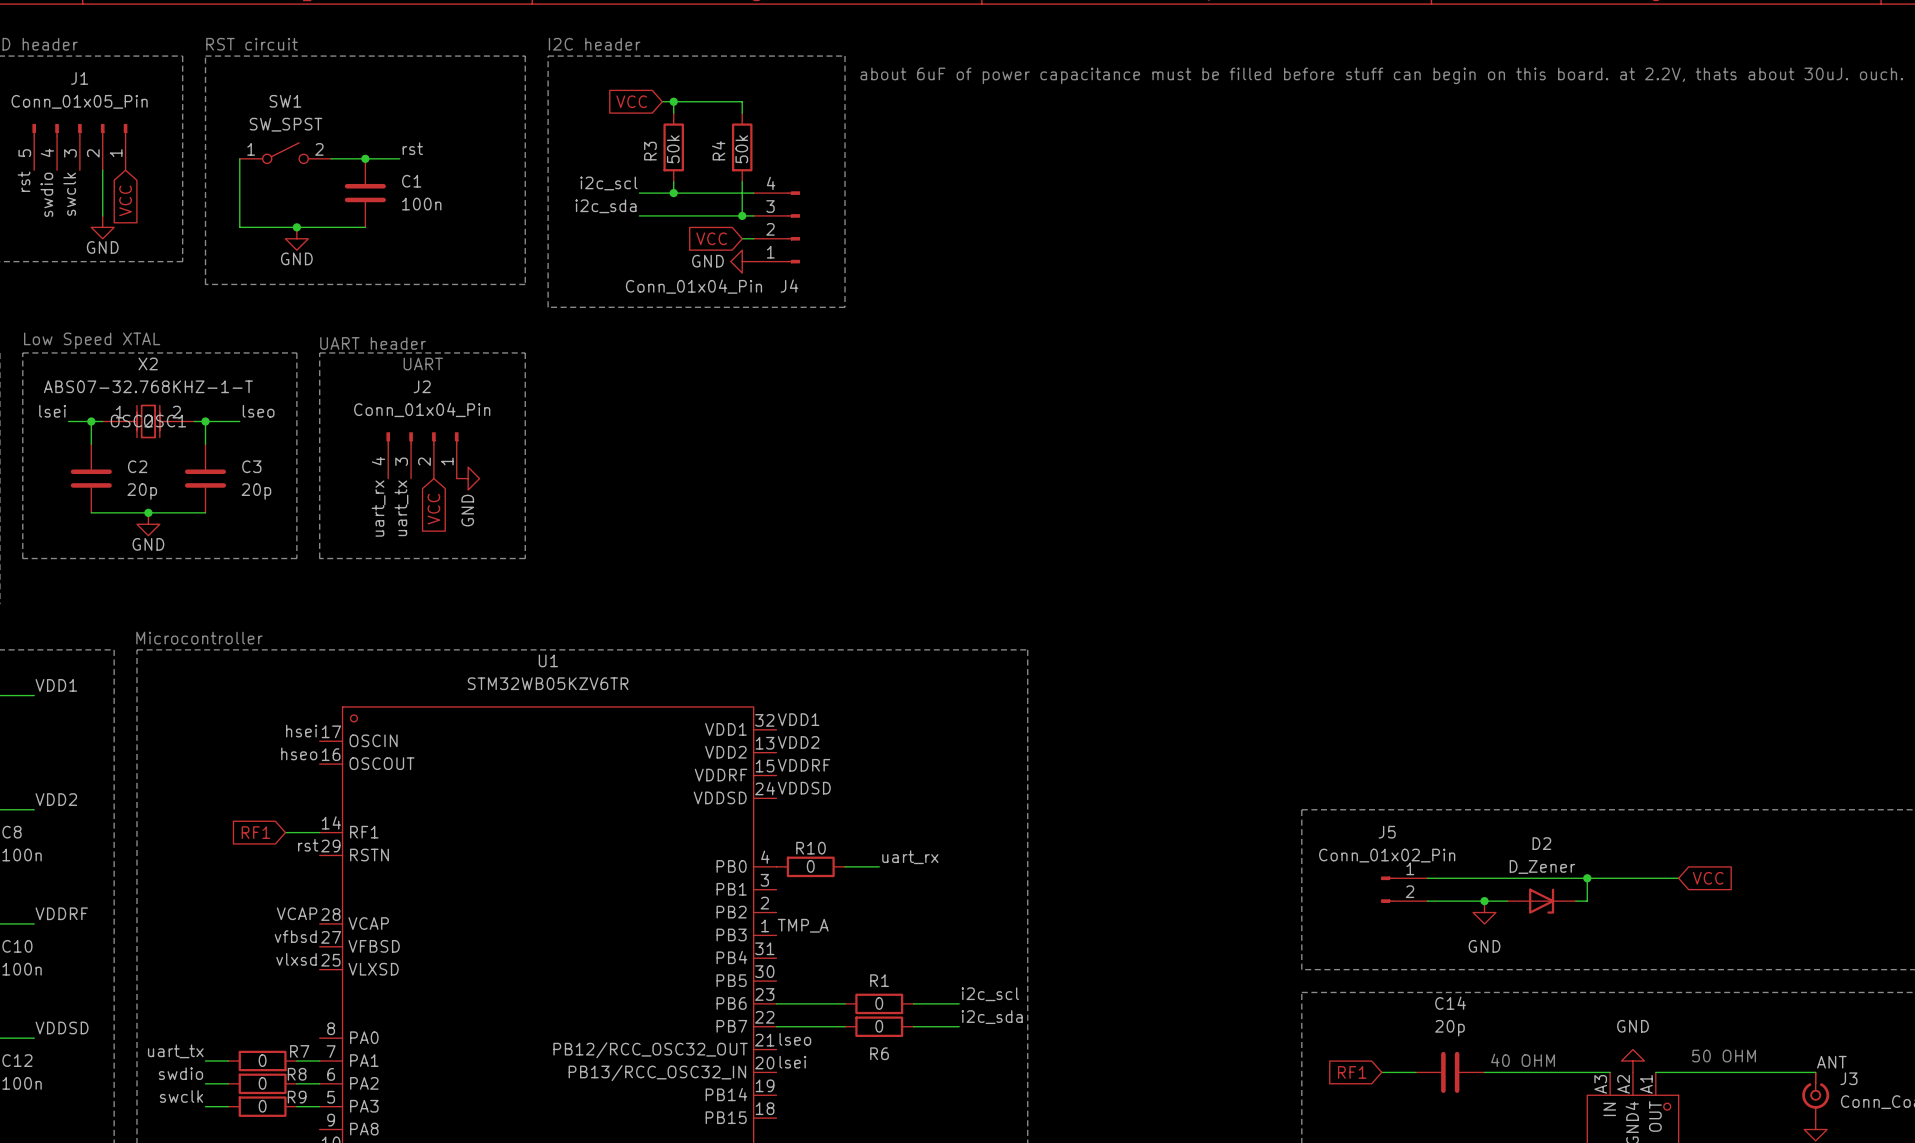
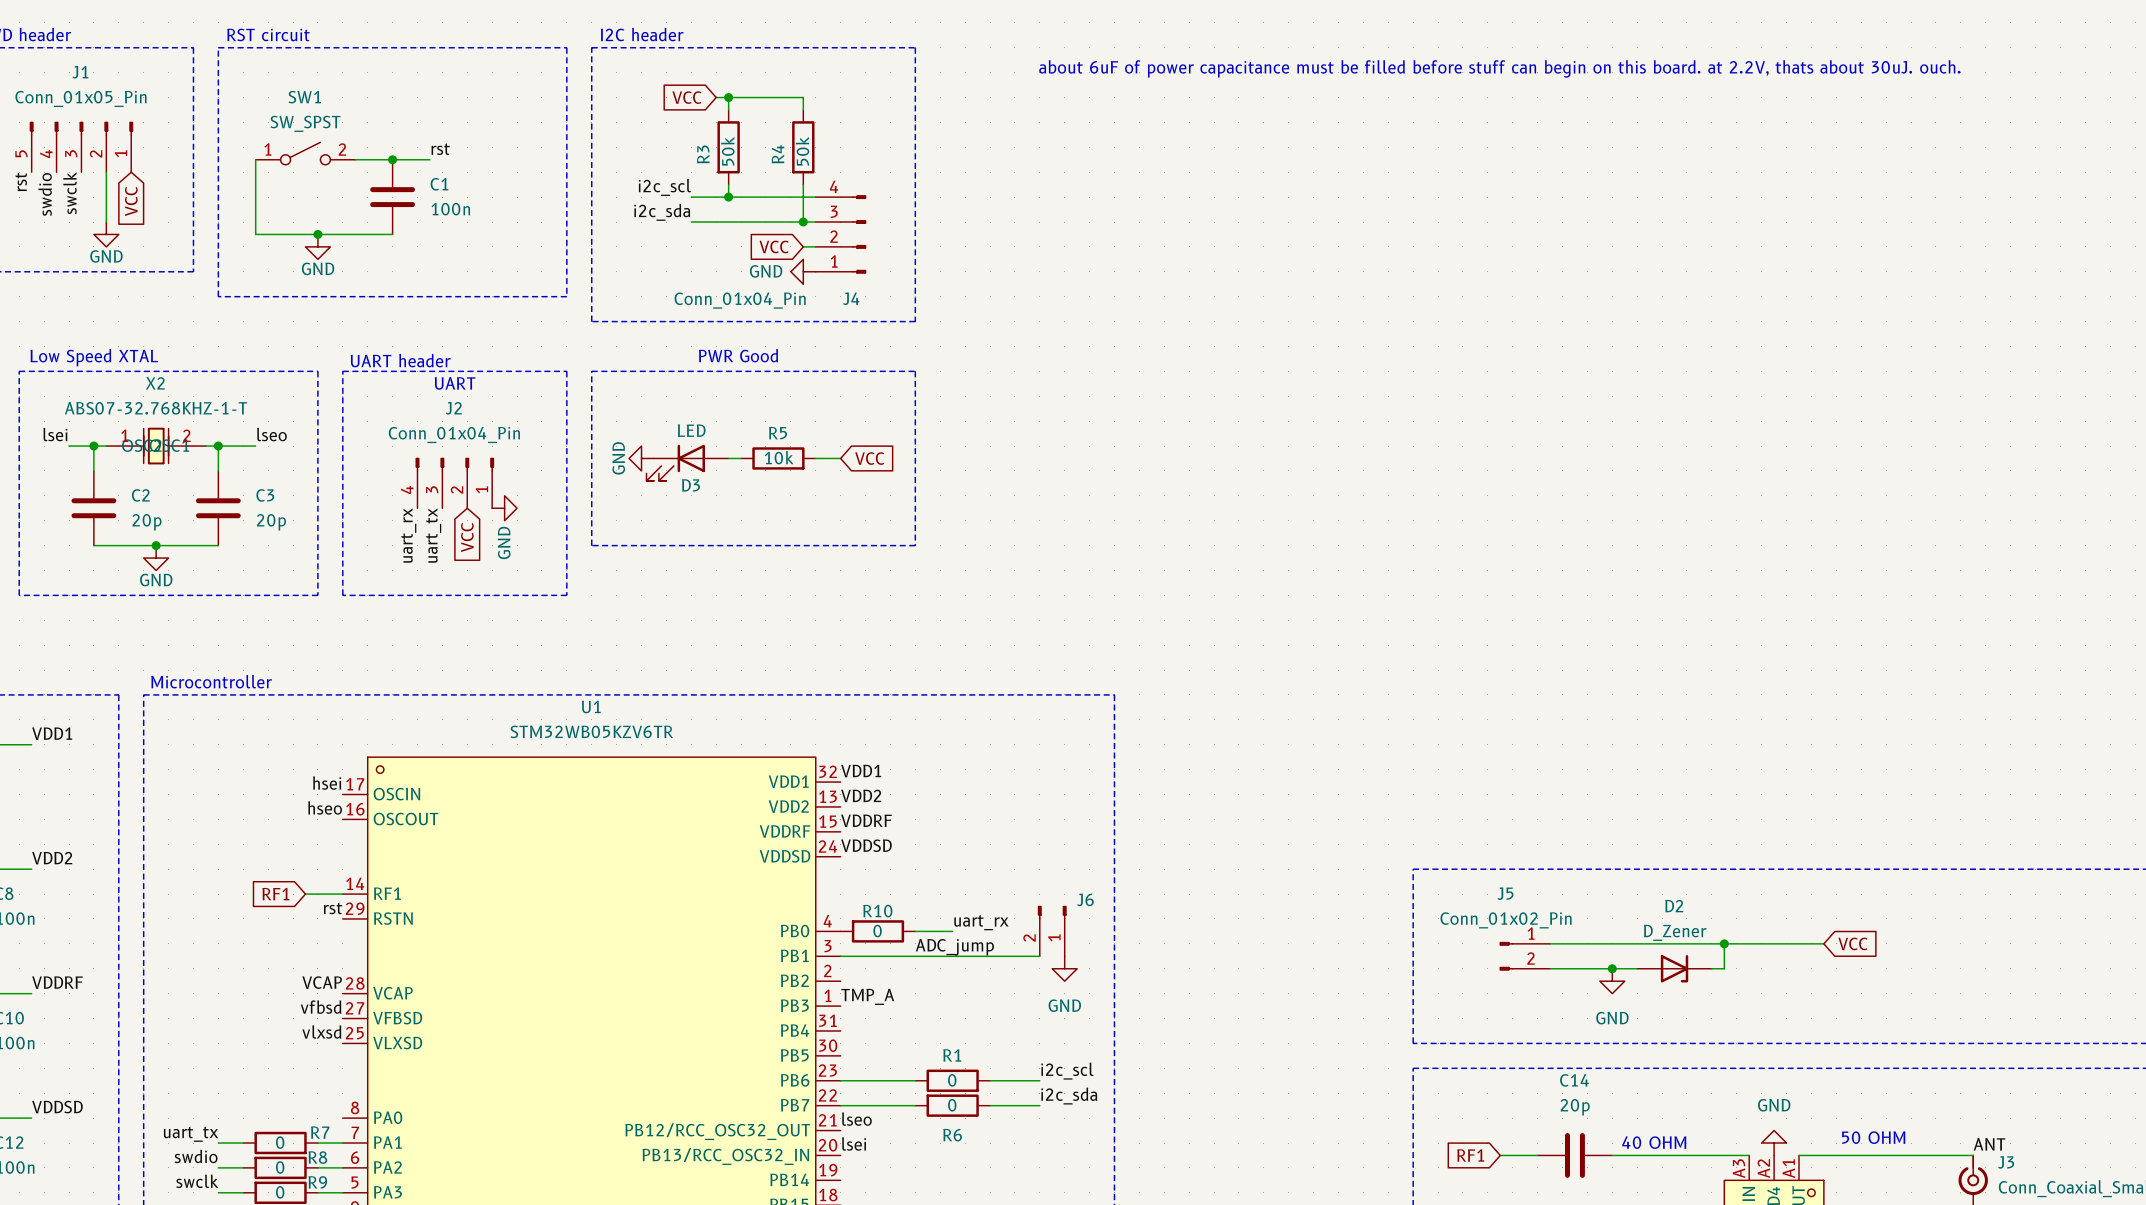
text: none -> PWR Good (738, 355)
line: none -> (591, 371) (915, 371) (915, 545) (591, 545) (591, 371)
power symbol: none -> GND (641, 458)
wire: none -> (728, 458) (741, 458)
R5: none -> 10k (778, 458)
wire: none -> (815, 458) (840, 458)
global label: none -> VCC (869, 458)
D3: none -> LED (687, 462)
J6: none -> (1052, 931)
label: none -> ADC_jump (954, 947)
wire: none -> (840, 956) (1039, 956)
power symbol: none -> GND (1064, 968)

